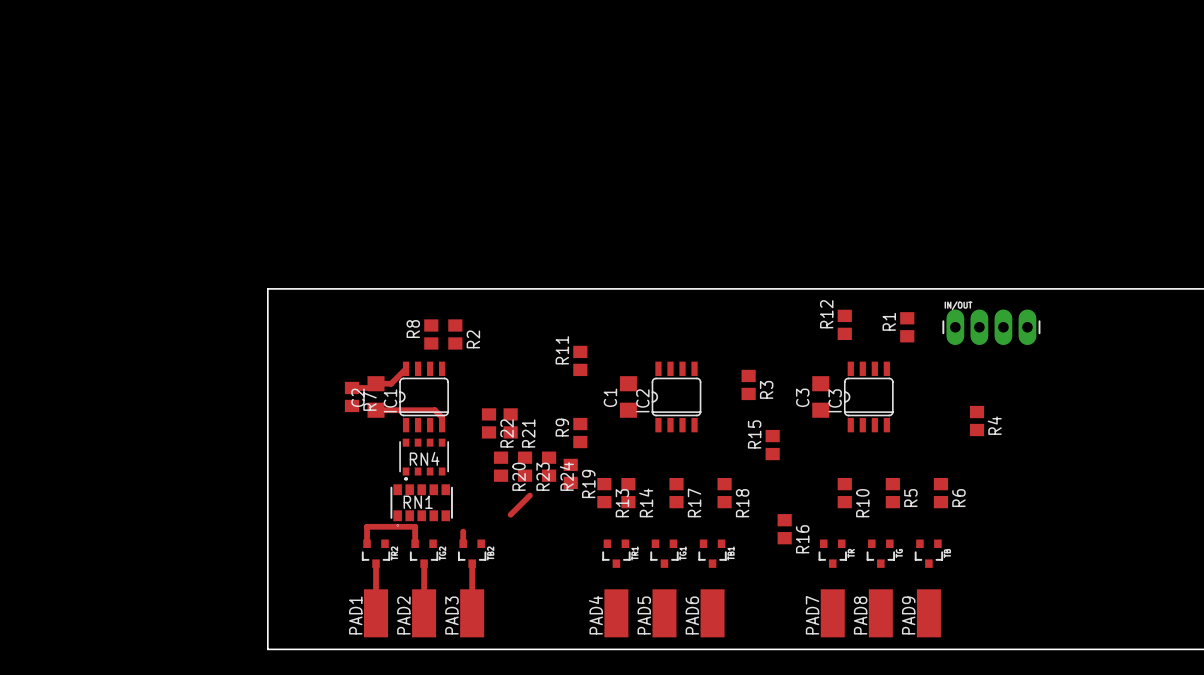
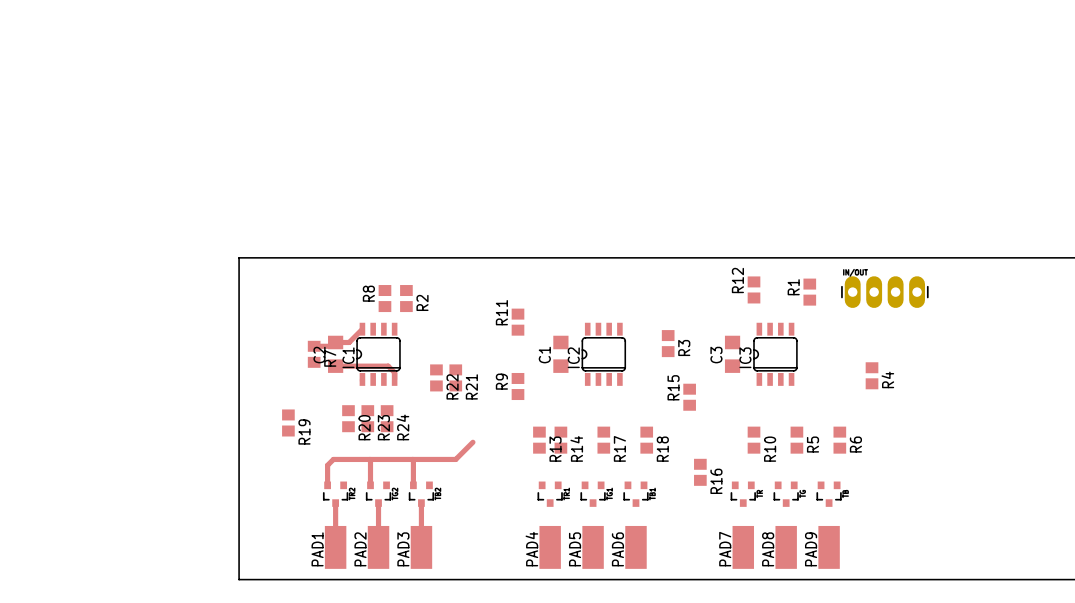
RN4: (424, 459) -> none
R20 position: (501, 466) -> (348, 418)
R23 position: (525, 466) -> (367, 418)
R24 position: (549, 466) -> (387, 418)
R19 position: (570, 473) -> (288, 422)
RN1: (421, 505) -> none
track: none -> (412, 459) (413, 474)
track: none -> (455, 459) (333, 459) (327, 465) (327, 470)
track: (367, 526) (415, 526) -> (369, 459) (370, 470)

